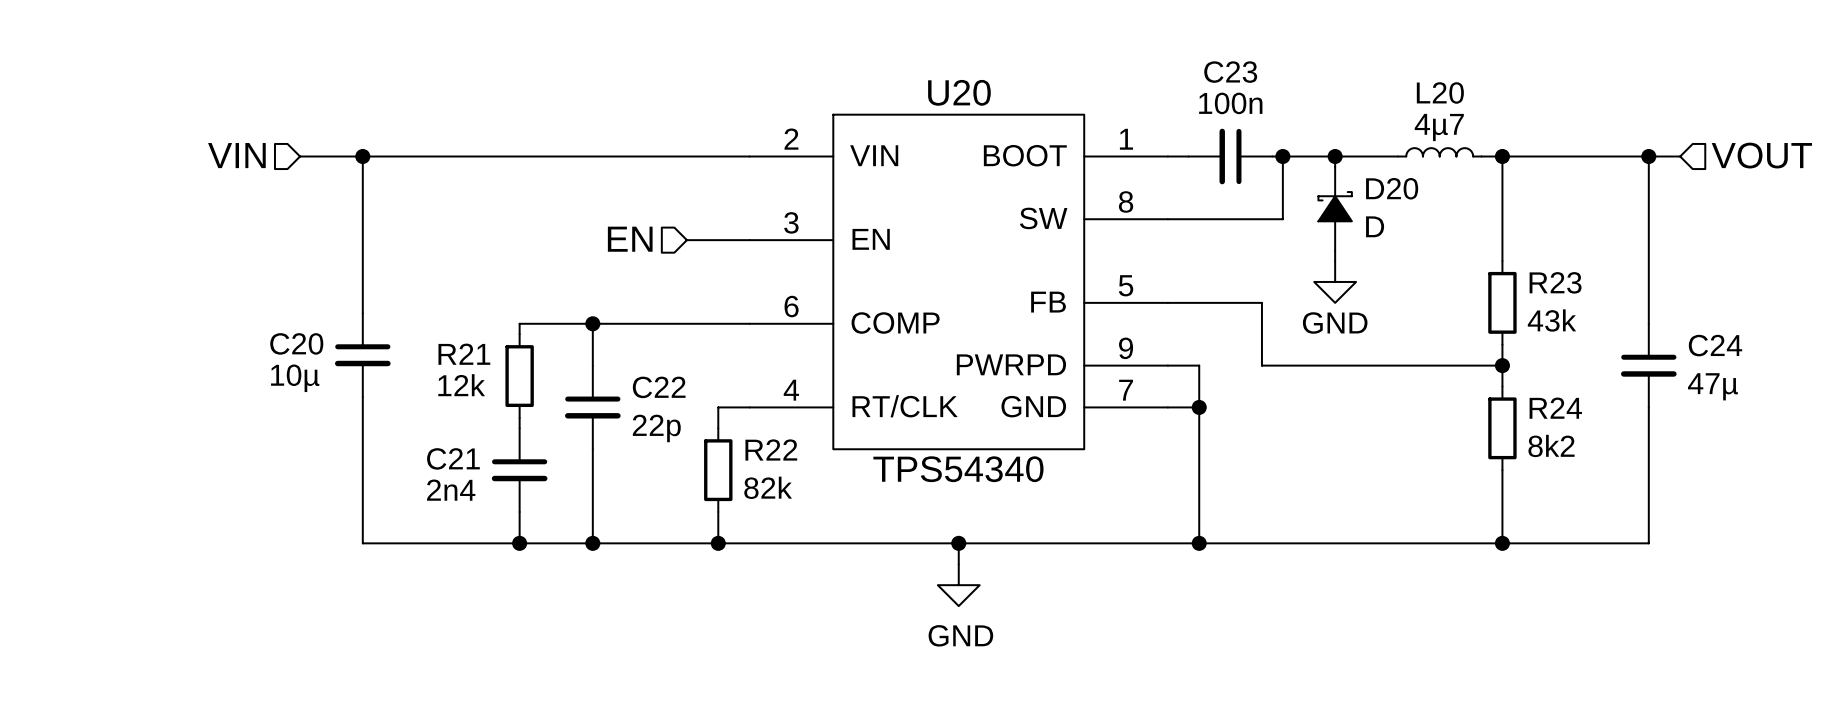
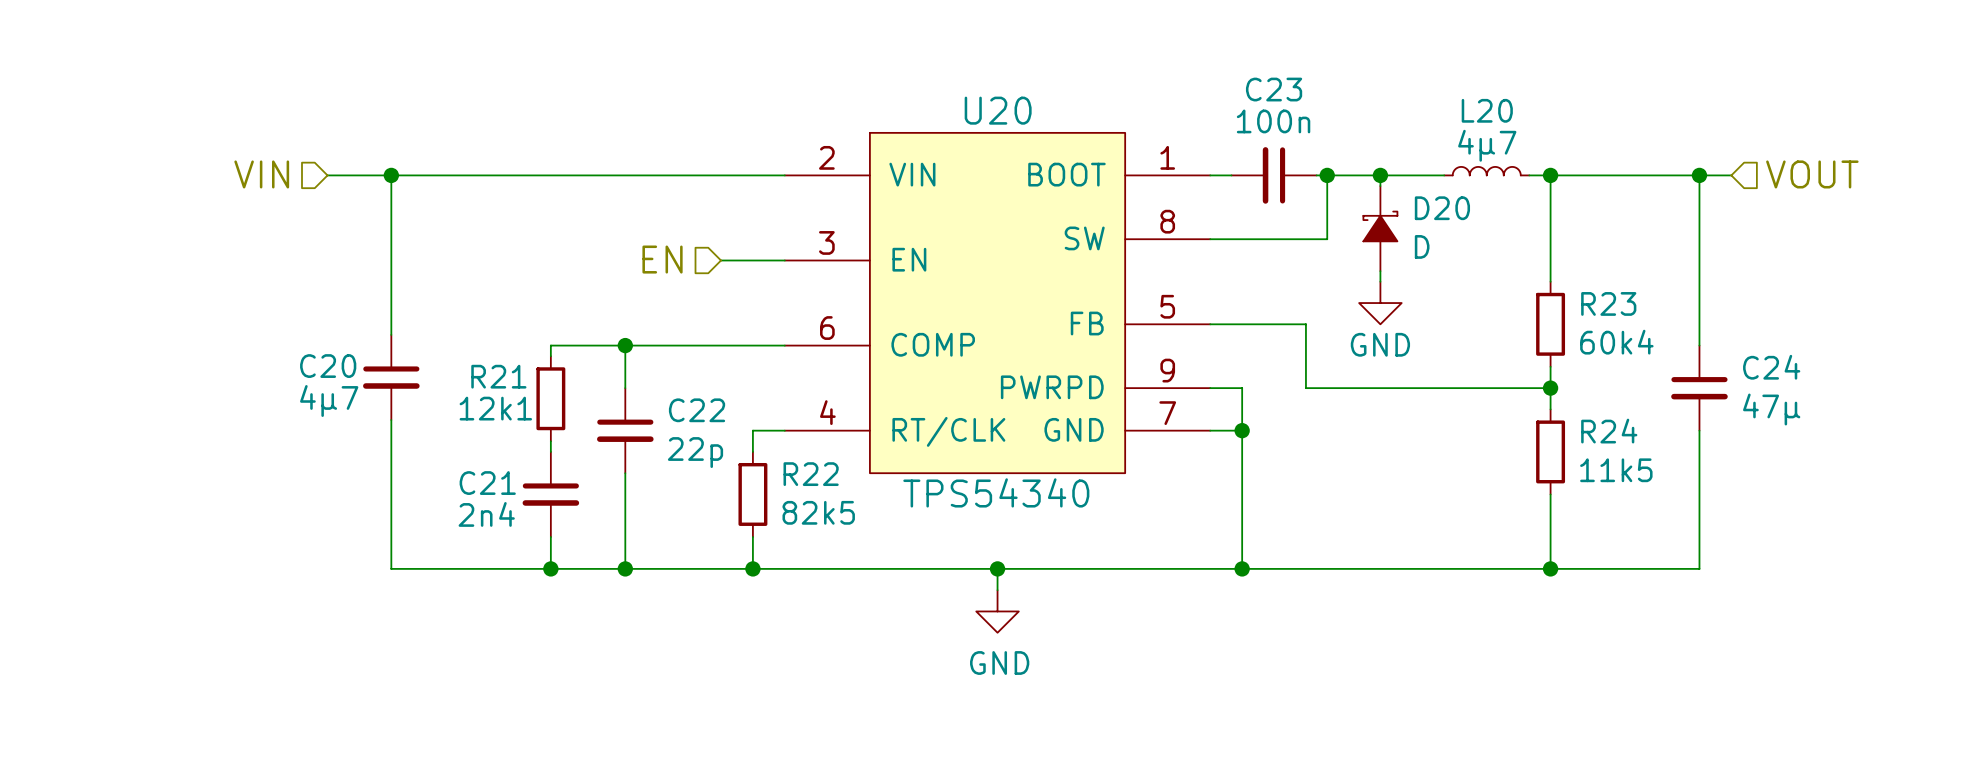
R23 value: 43k (1551, 320) -> 60k4 (1616, 342)
C20 value: 10µ (295, 378) -> 4µ7 (329, 401)
R21 value: 12k (461, 385) -> 12k1 (495, 408)
R24 value: 8k2 (1551, 445) -> 11k5 (1616, 470)
R22 value: 82k (768, 487) -> 82k5 (818, 512)

